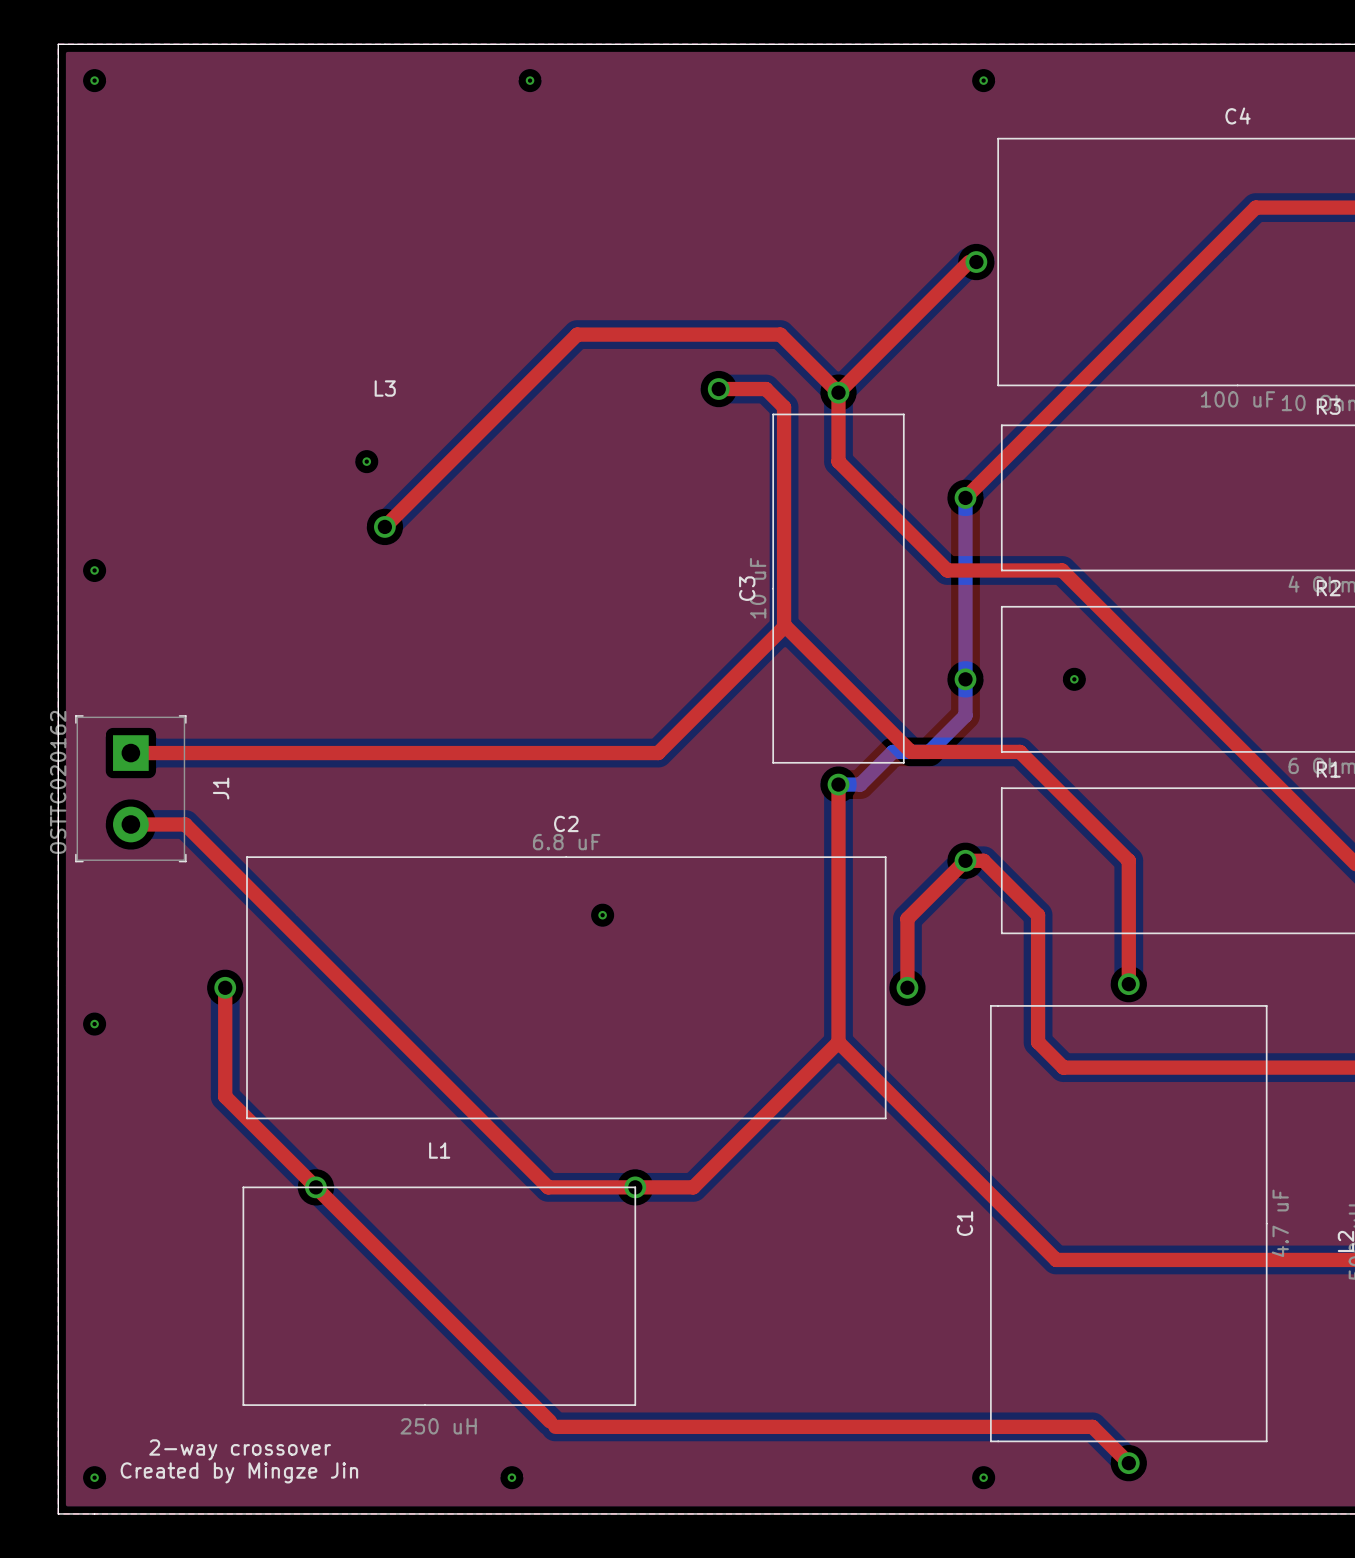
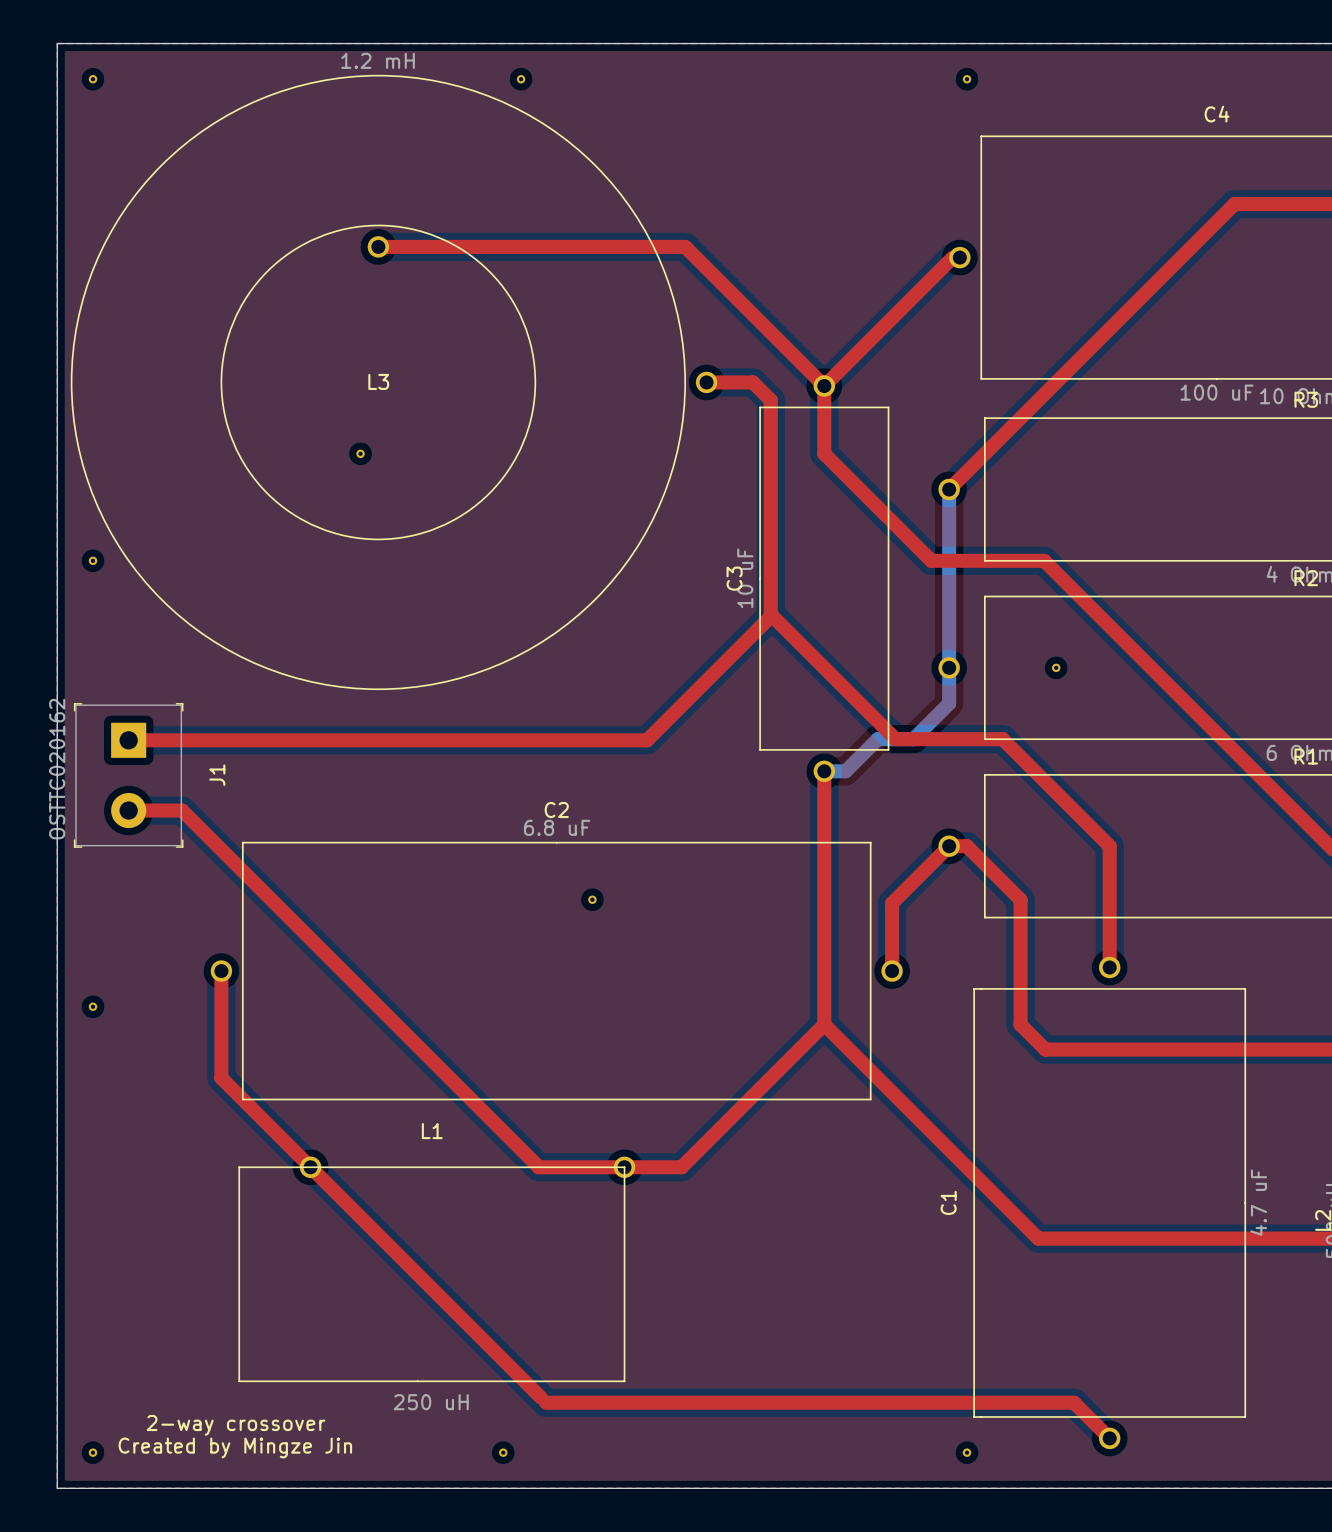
top track: (780, 334) (577, 334) (384, 526) -> (767, 328) (685, 246) (378, 246)
L3 side: bottom (551, 457) -> top (394, 382)

